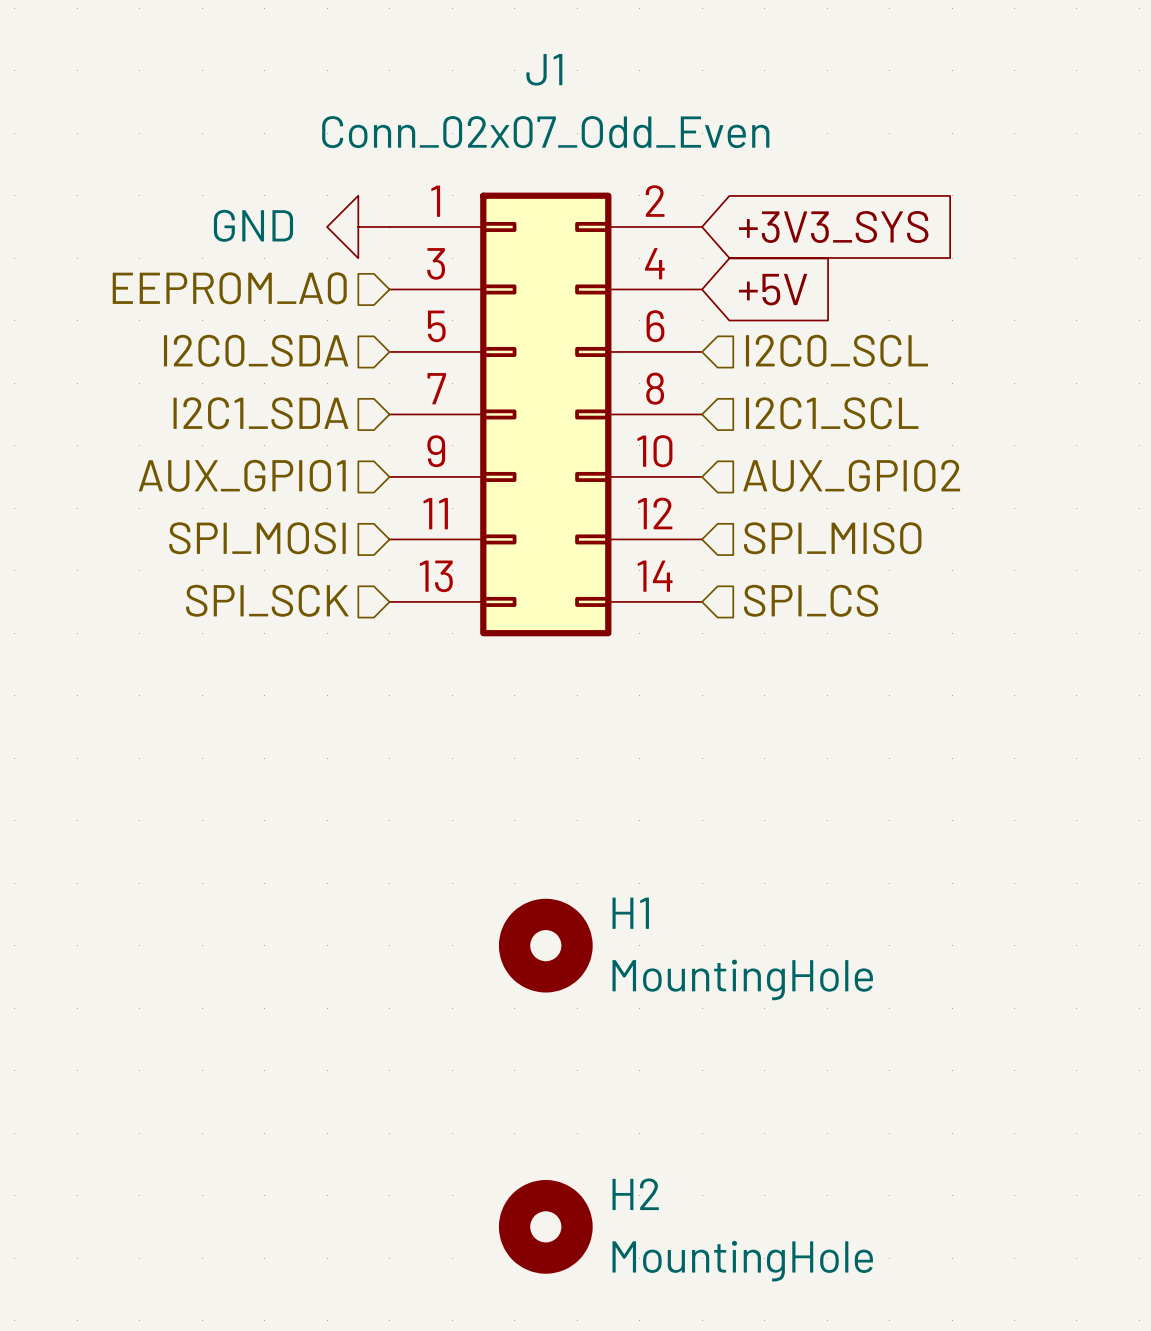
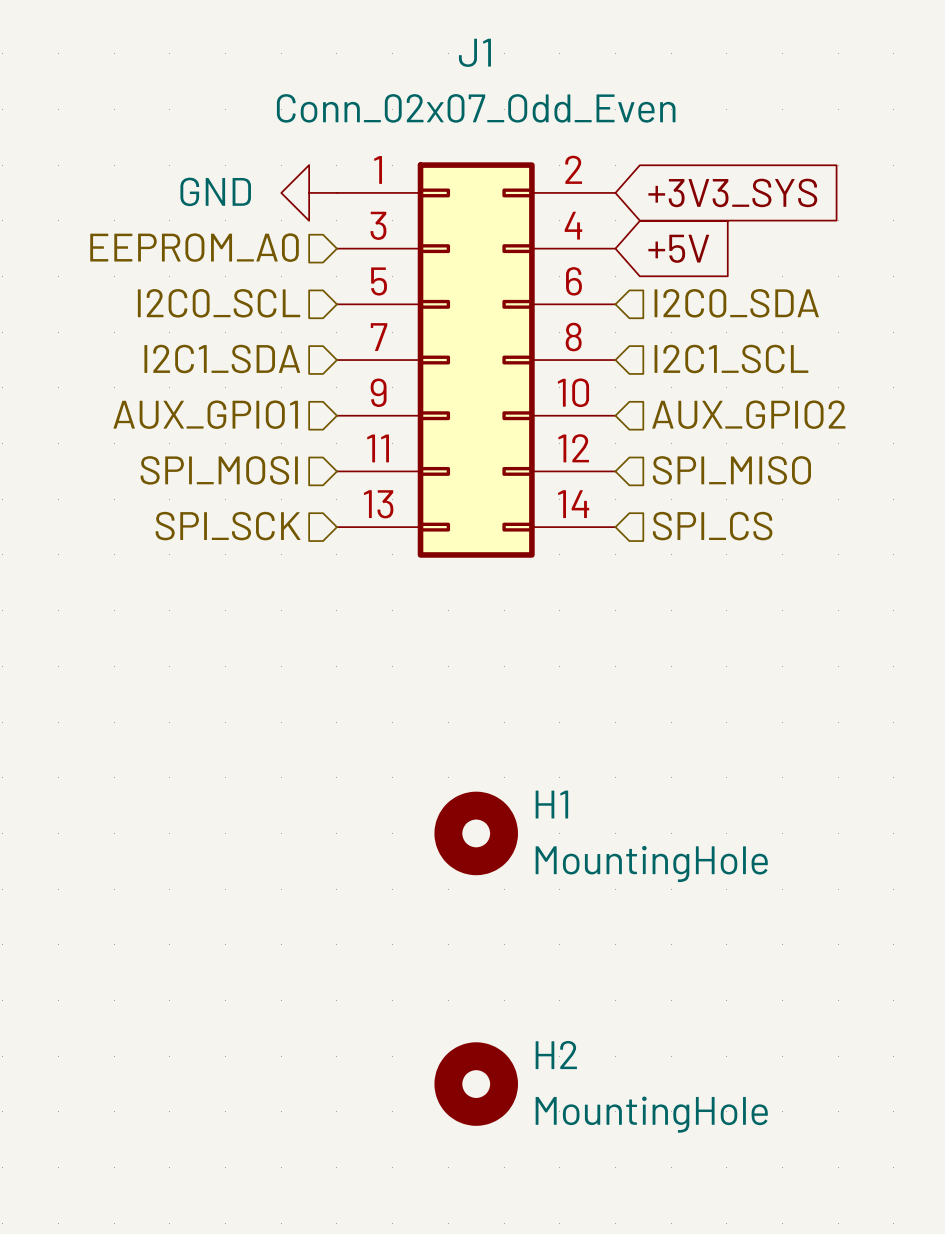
hierarchical label: I2C0_SDA (256, 350) -> I2C0_SCL (219, 303)
hierarchical label: I2C0_SCL (836, 350) -> I2C0_SDA (736, 303)

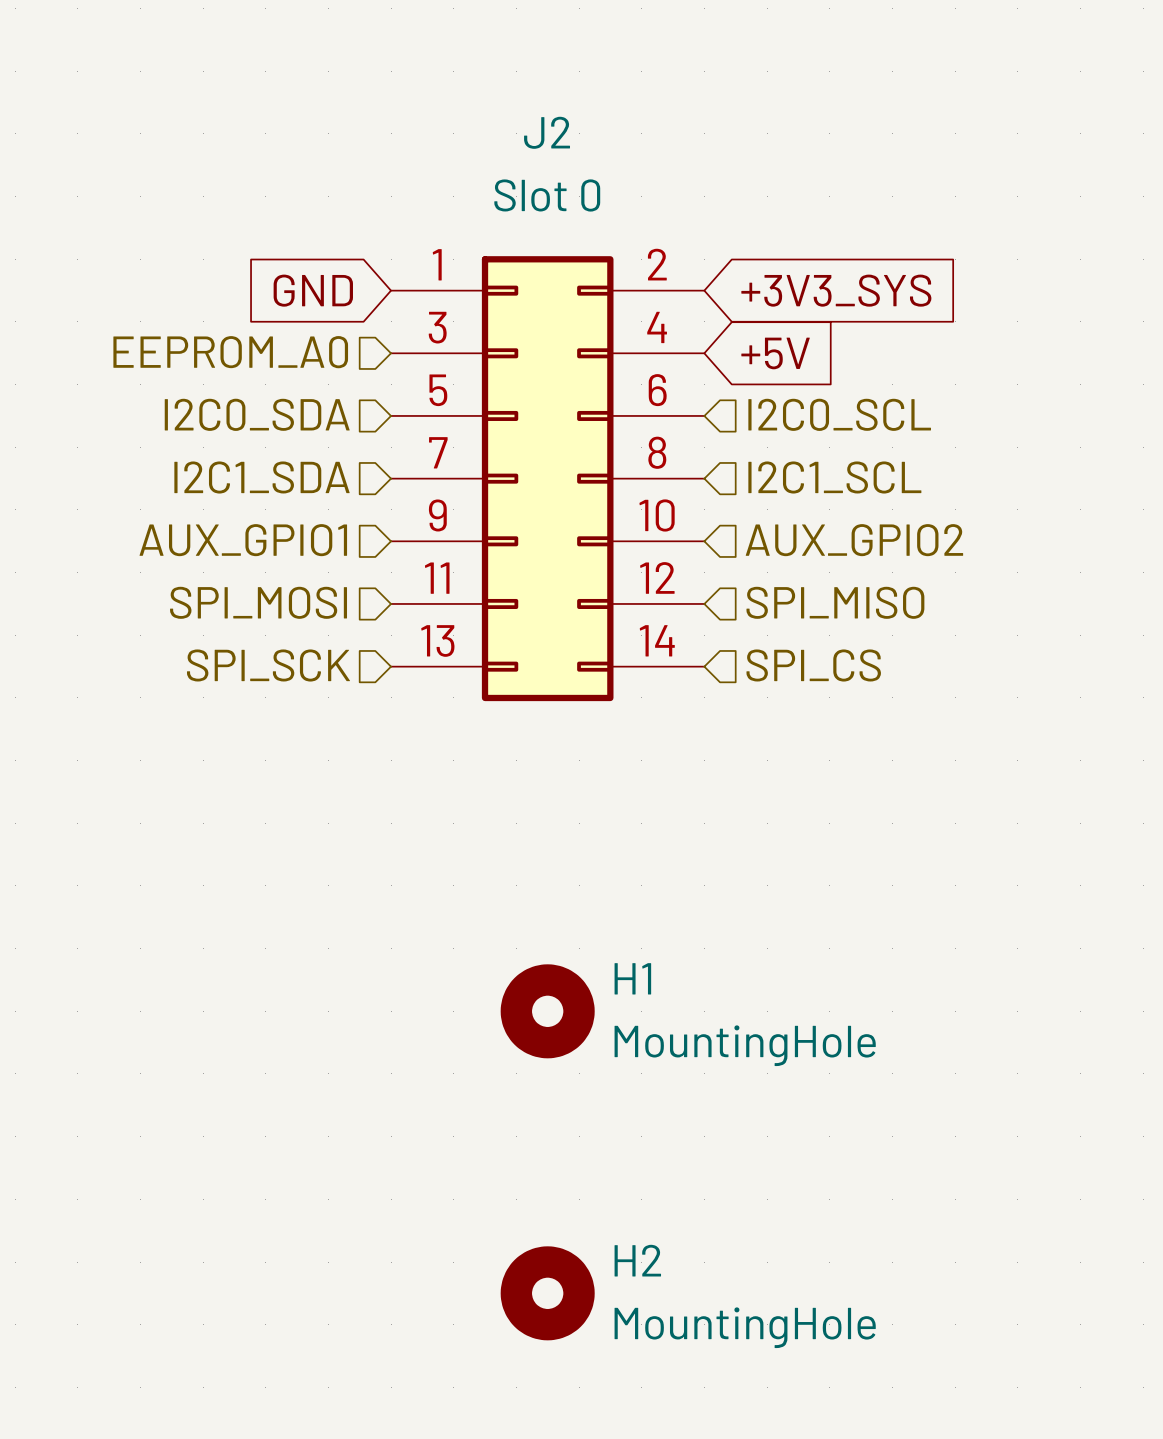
J1 name: J1 (474, 52) -> J2 (547, 132)
J1 value: Conn_02x07_Odd_Even (476, 108) -> Slot 0 (547, 195)
global label: none -> GND (313, 290)
power symbol: GND (309, 192) -> none
hierarchical label: I2C0_SCL (219, 303) -> I2C0_SDA (257, 414)
hierarchical label: I2C0_SDA (736, 303) -> I2C0_SCL (839, 414)

